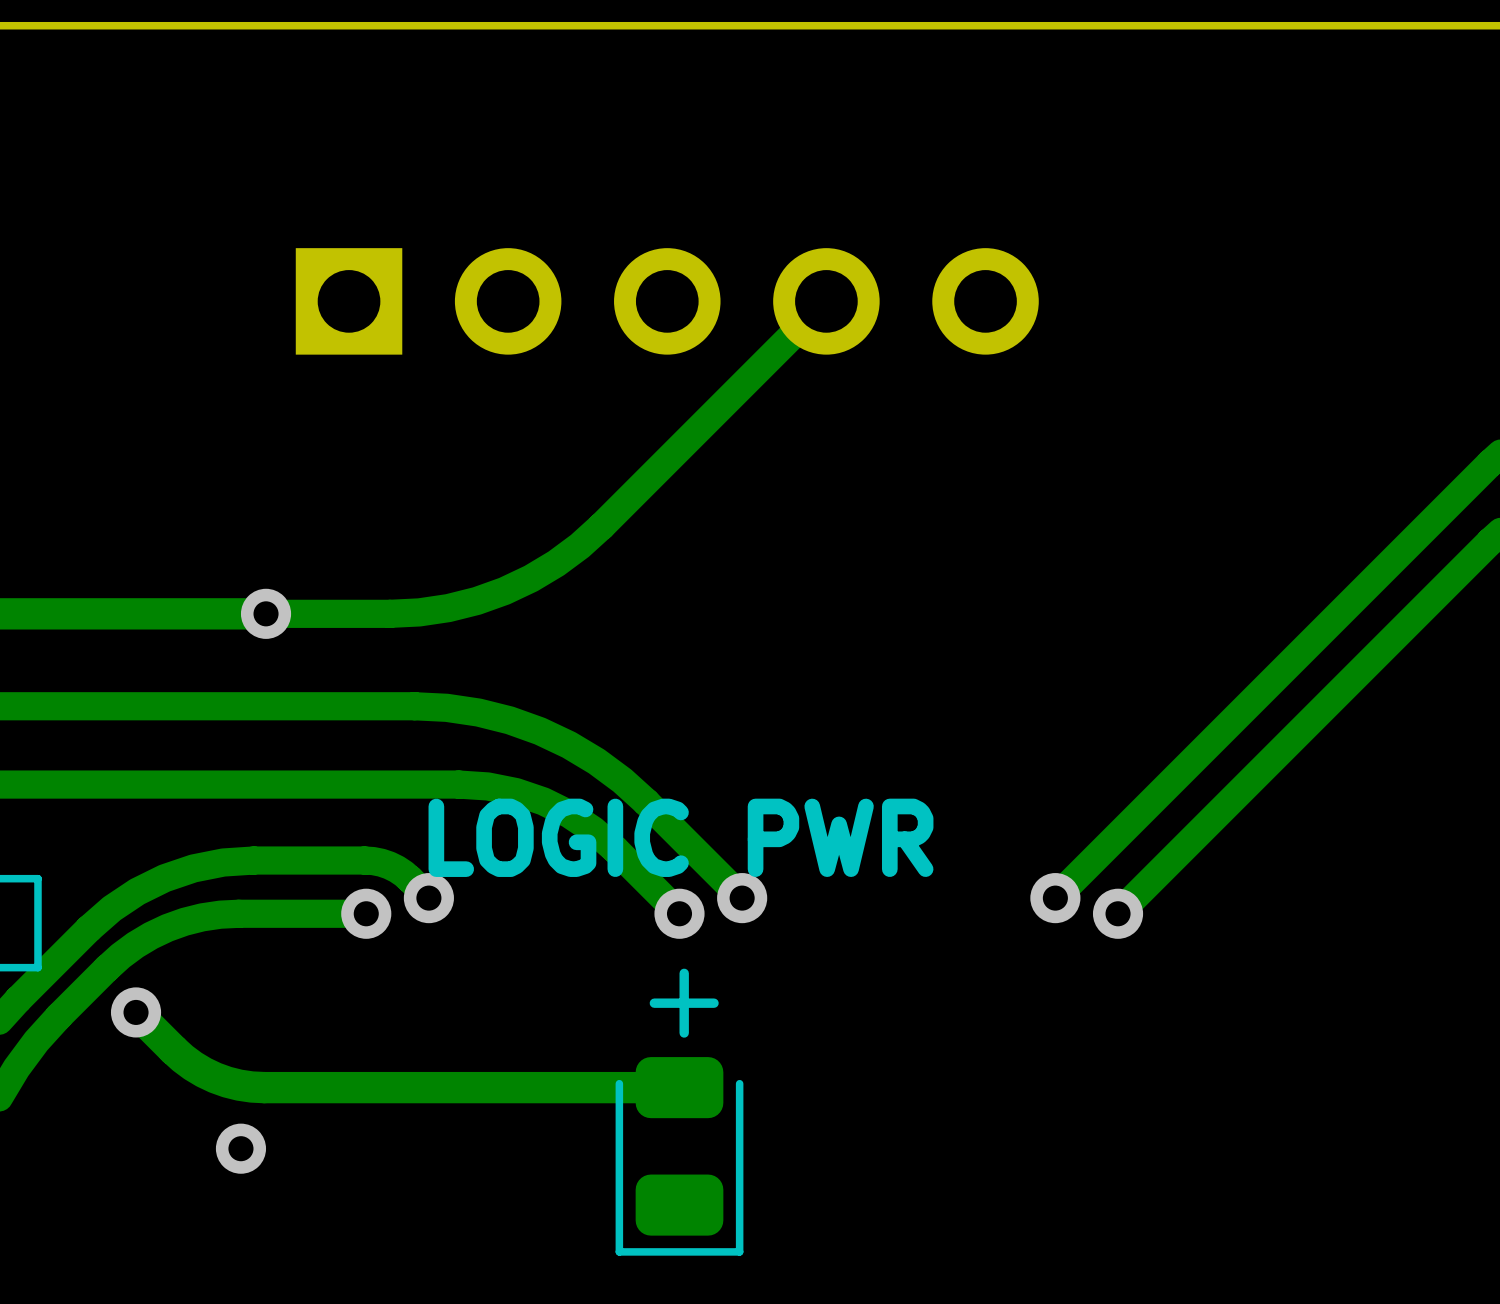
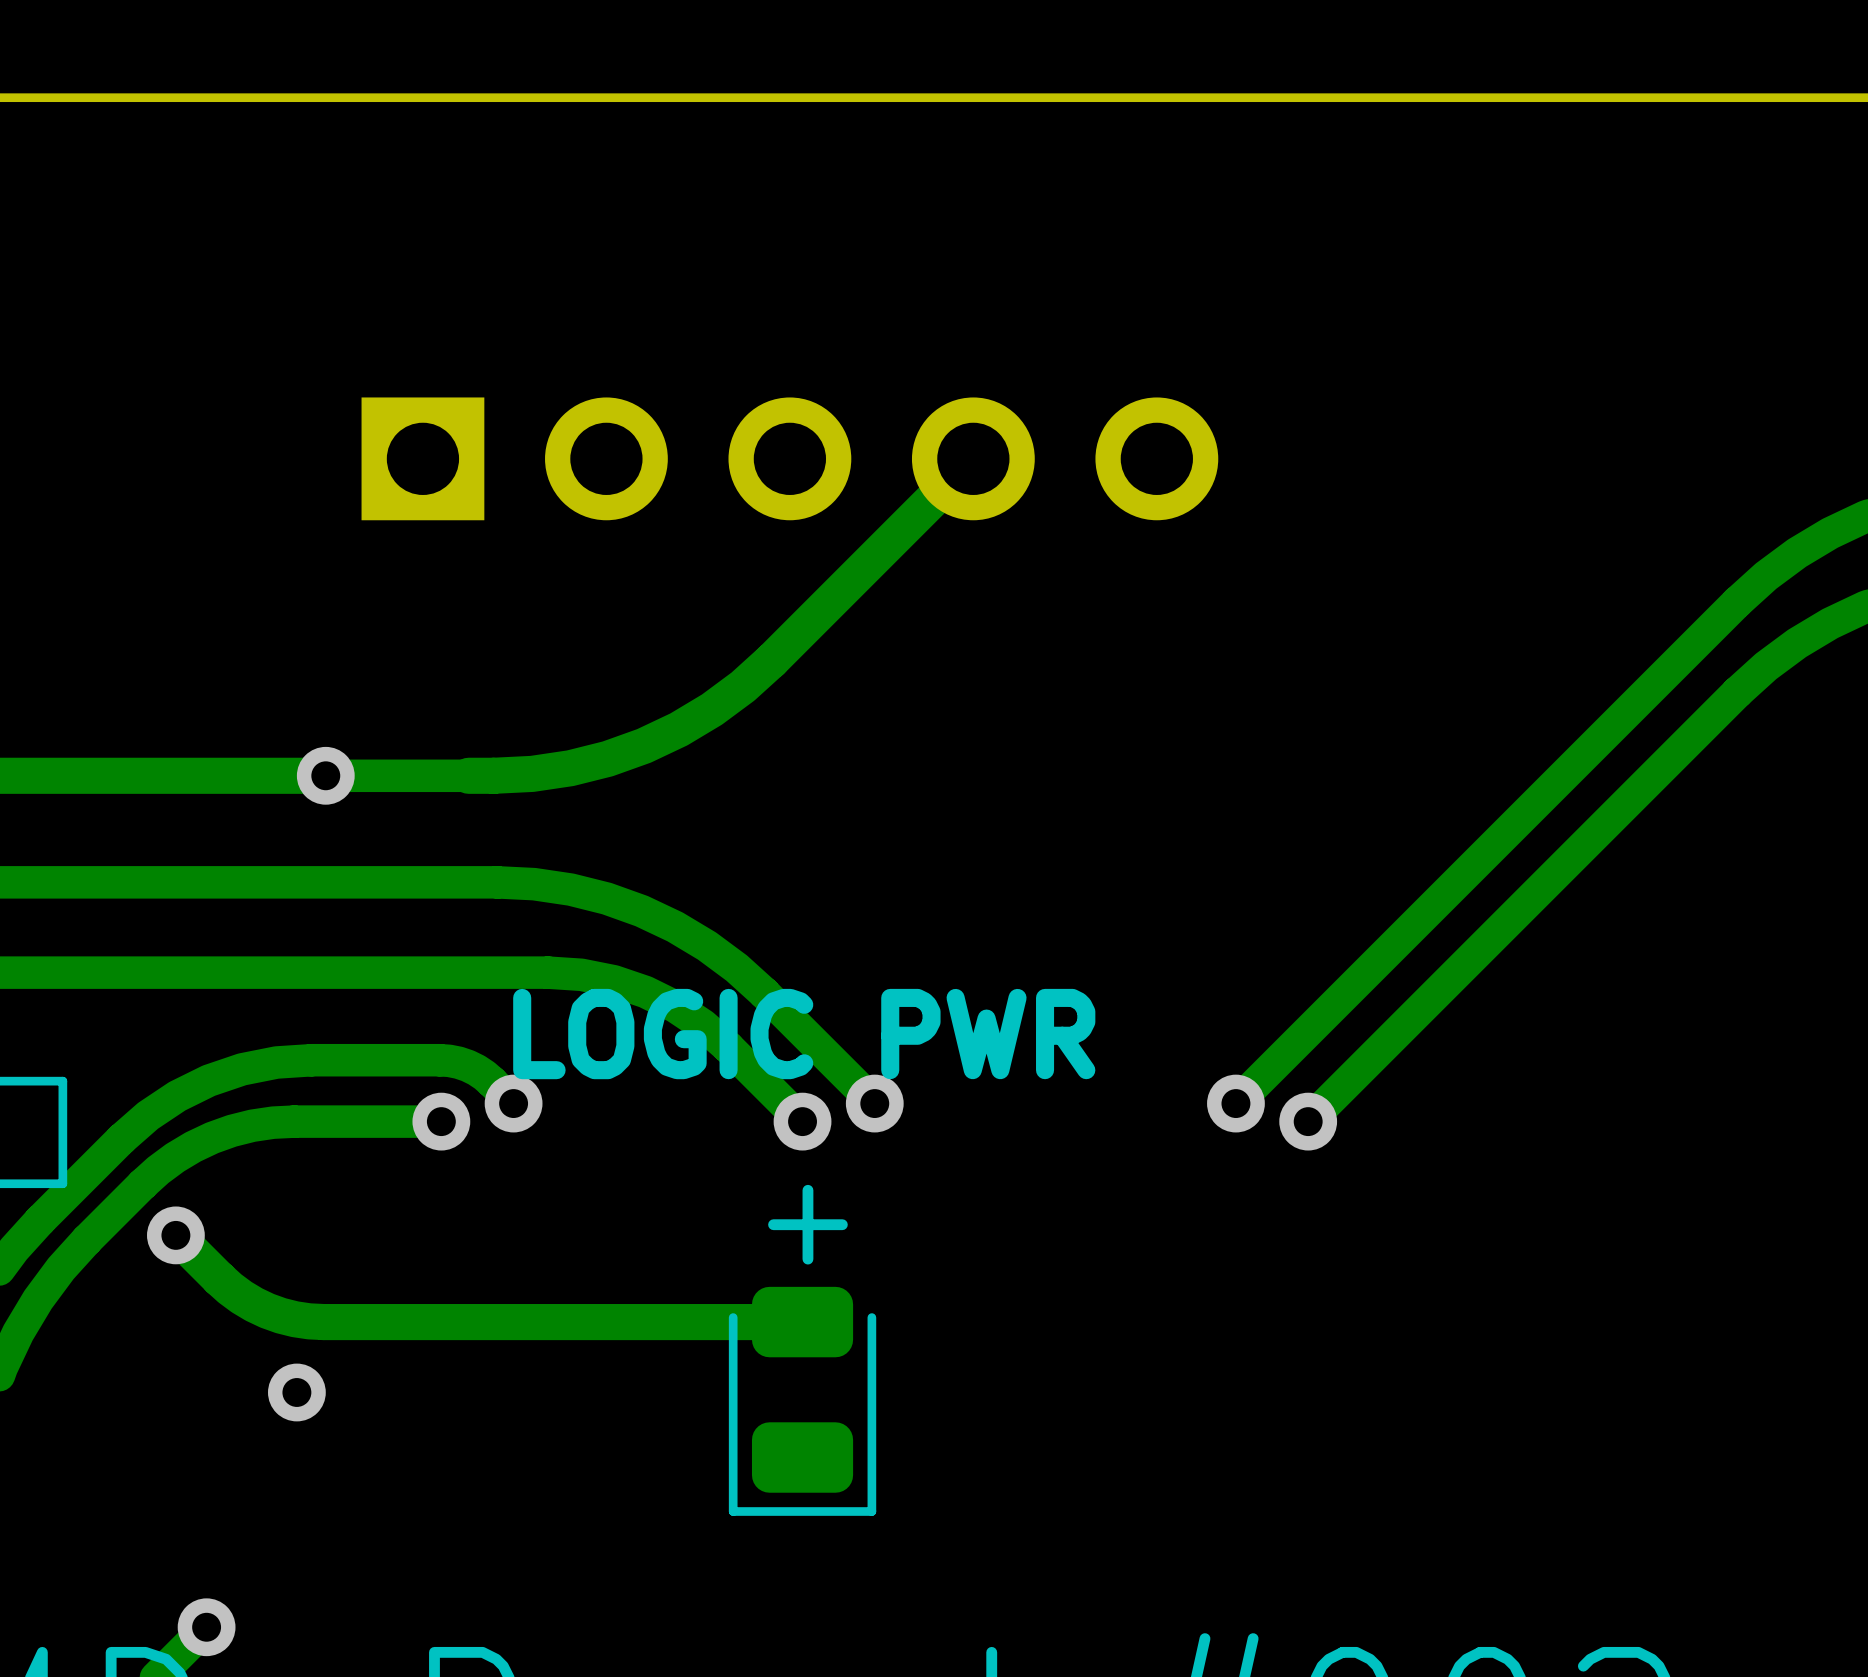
part position: (667, 301) -> (789, 458)
track: (826, 301) (601, 526) (556, 563) (504, 591) (476, 600) (419, 612) (389, 613) -> (973, 458) (771, 660) (742, 686) (712, 709) (678, 729) (644, 745) (607, 758) (570, 768) (532, 773) (468, 775)

